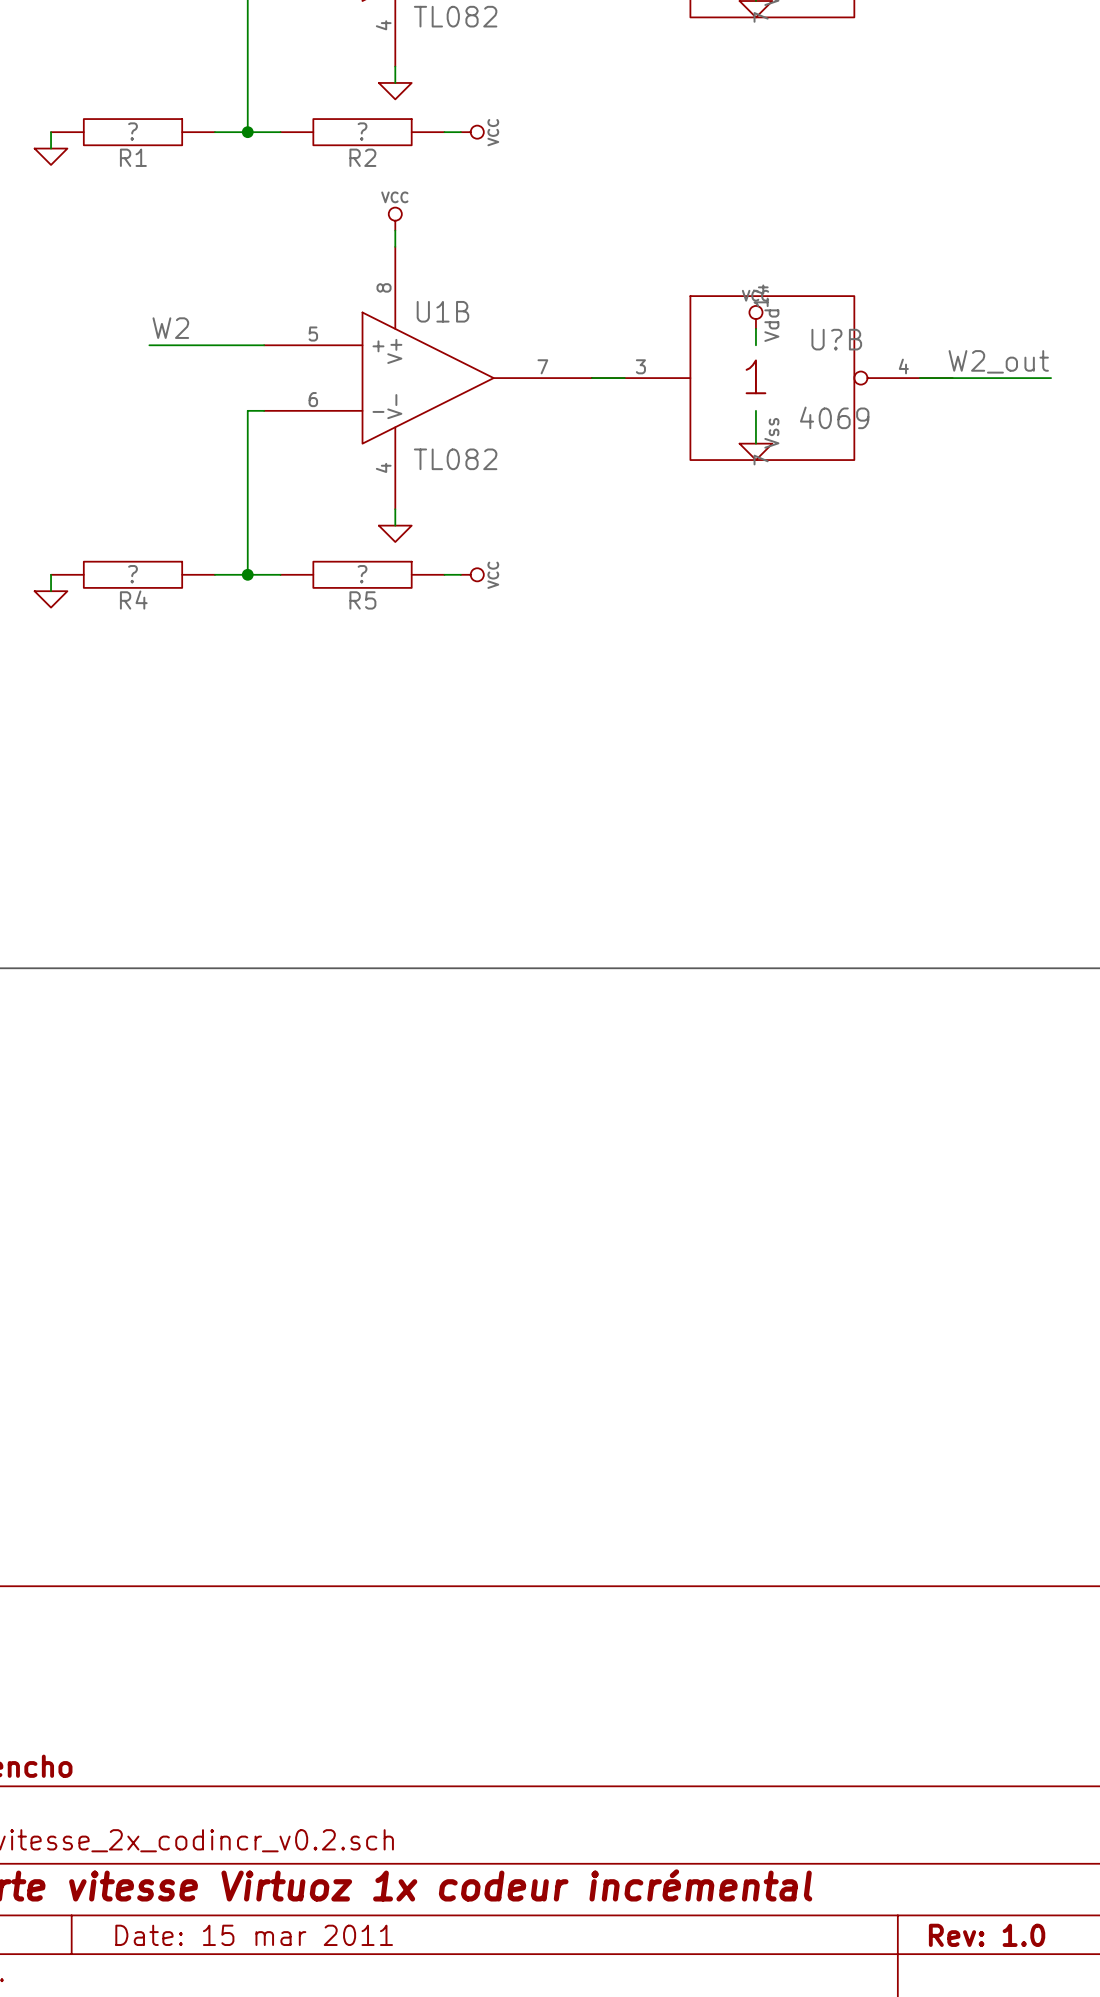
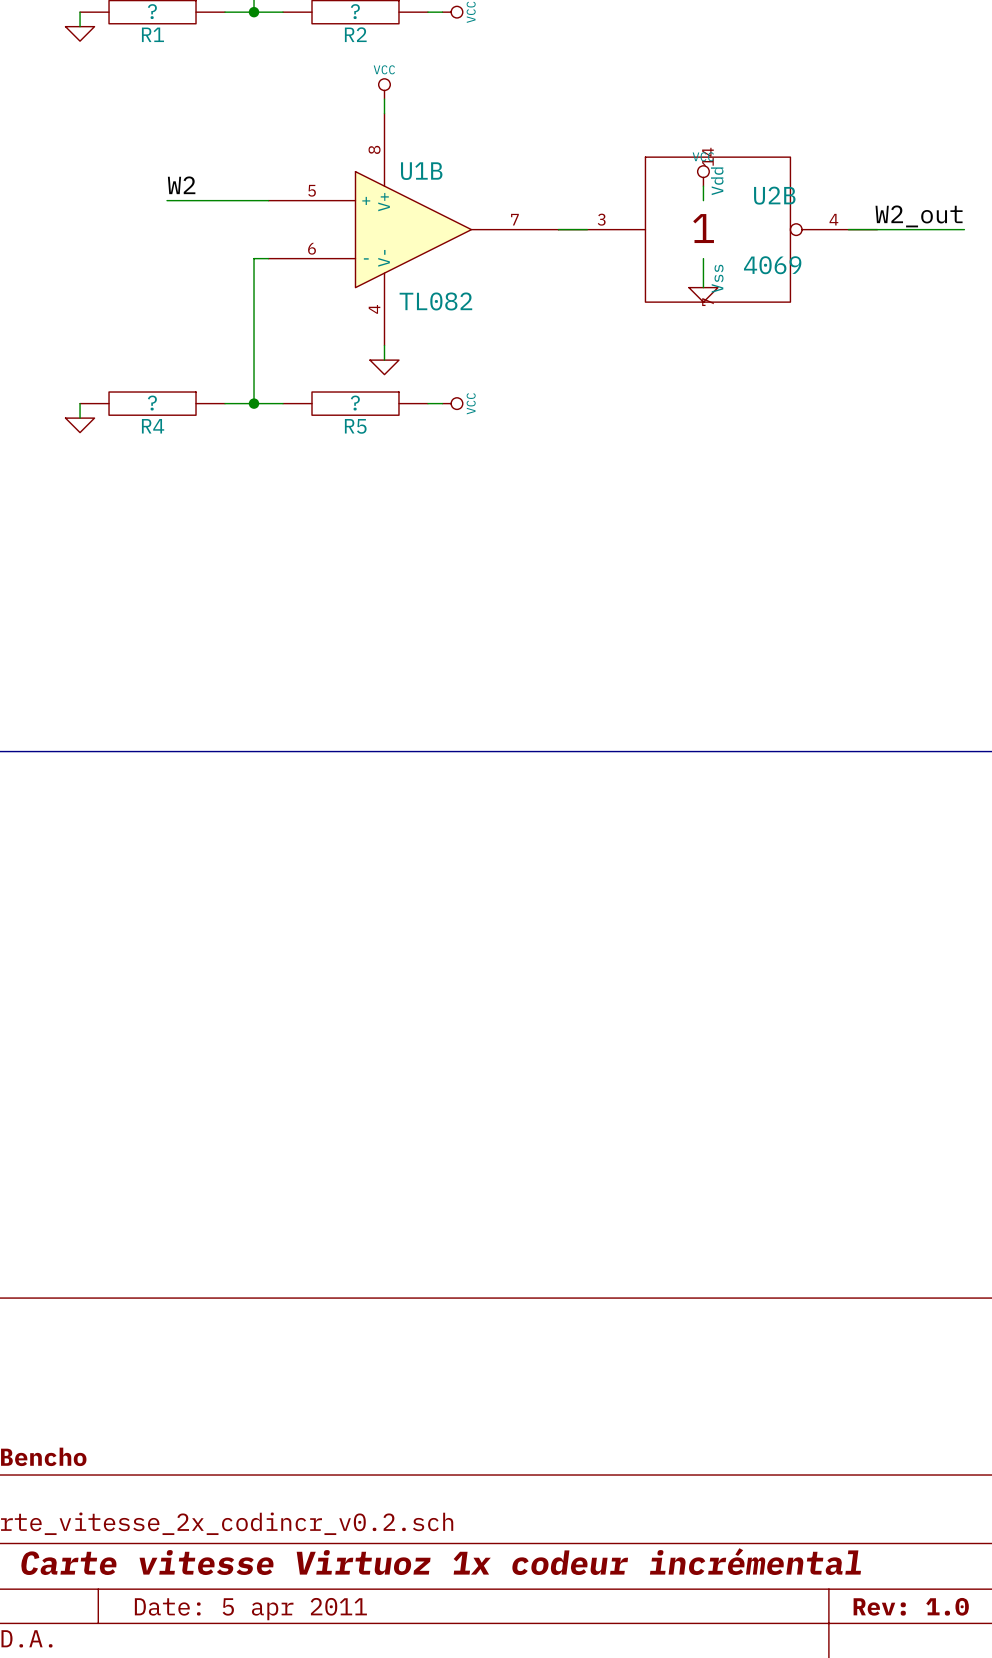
U?B name: U?B (836, 339) -> U2B (774, 195)
title block: Date: 15 mar 2011 (254, 1935) -> Date: 5 apr 2011 (250, 1609)

